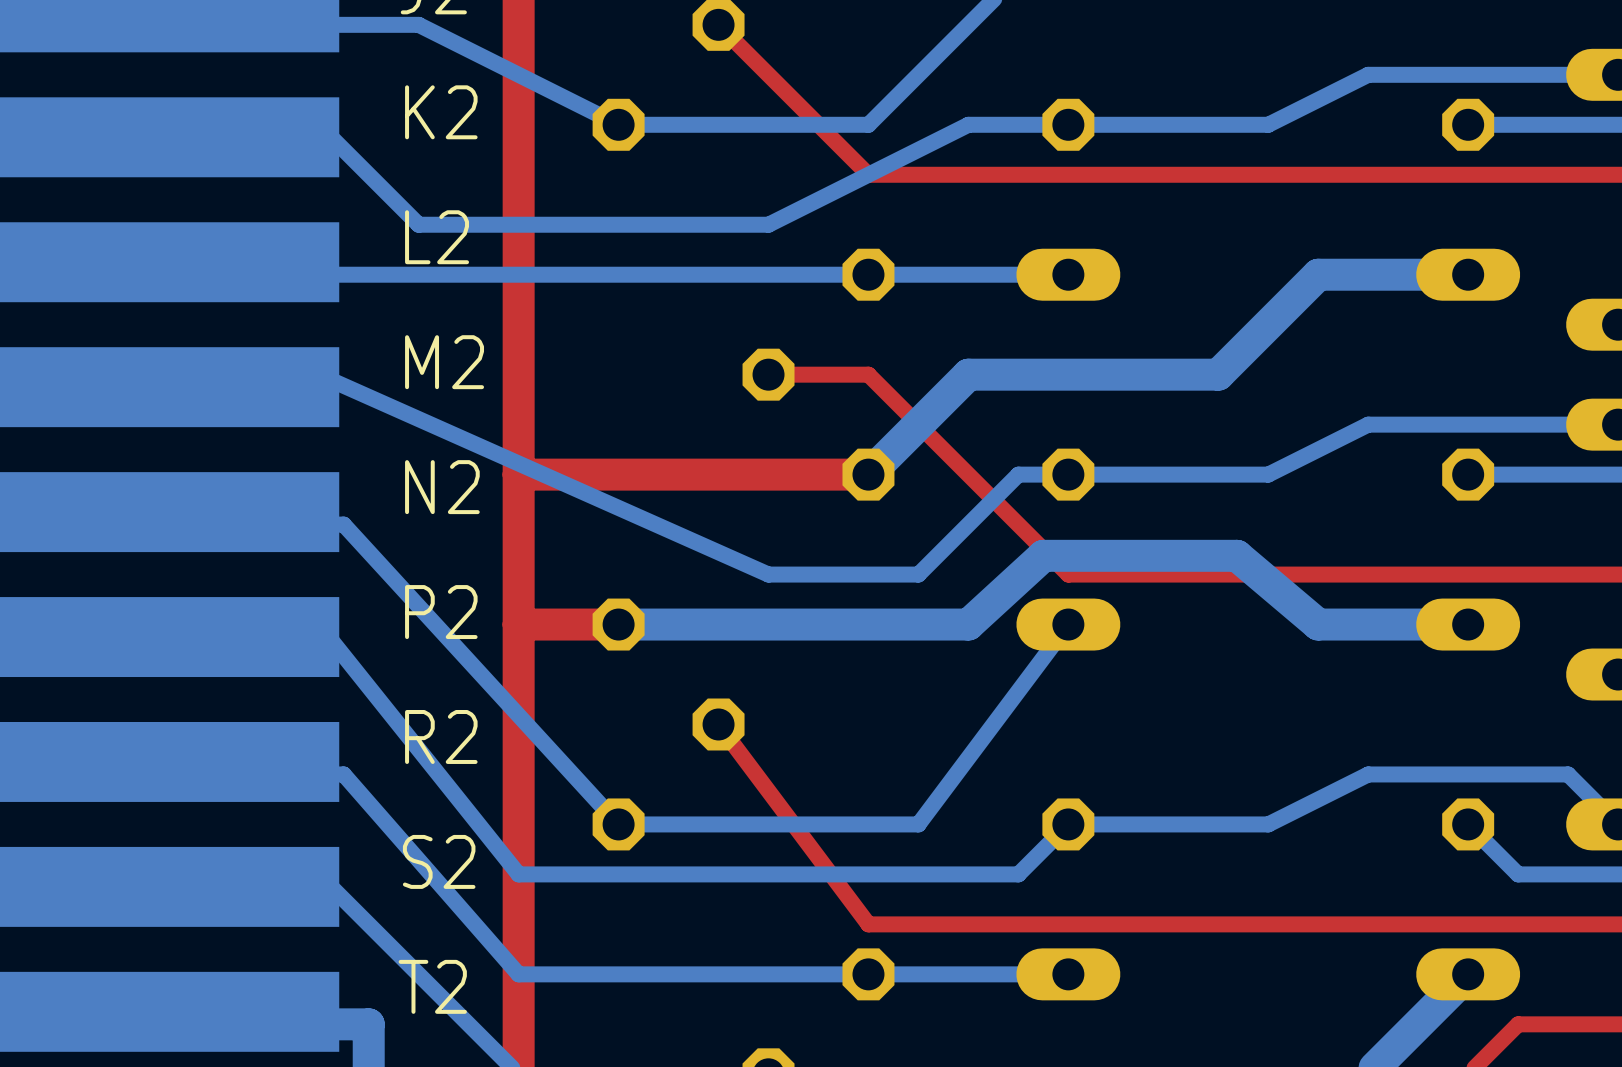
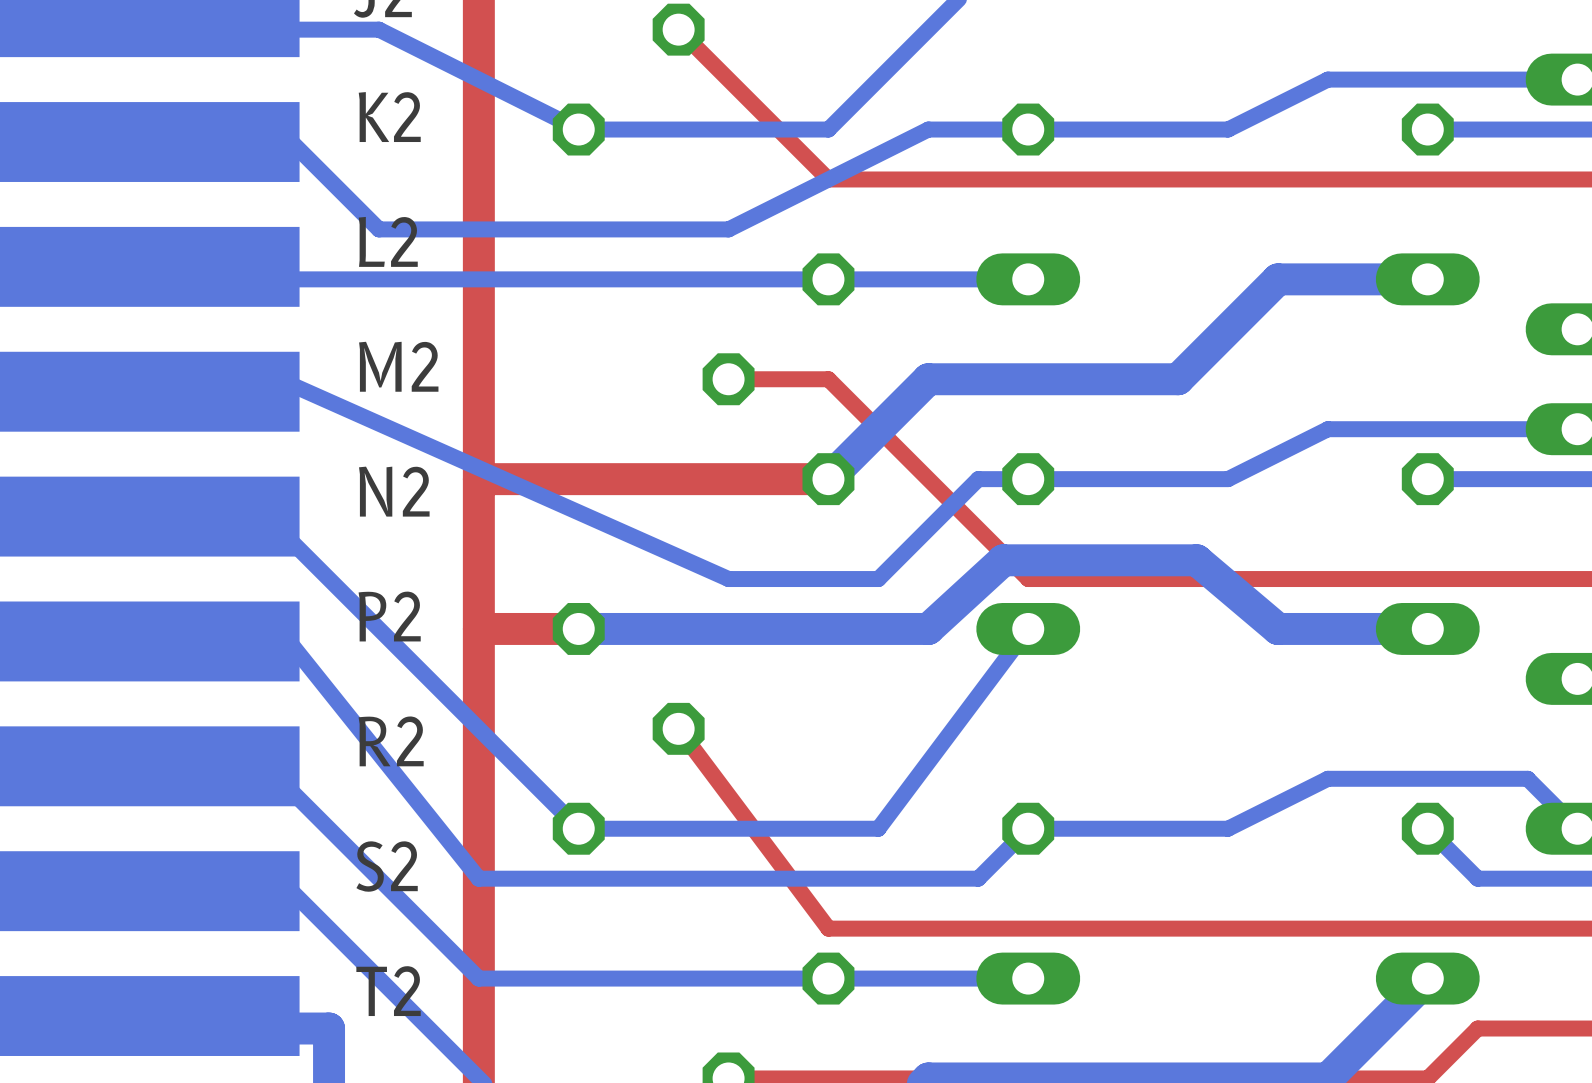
bottom track: (318, 524) (343, 524) (618, 824) -> (279, 529) (578, 828)
bottom track: (318, 774) (343, 774) (518, 974) -> (279, 778) (478, 978)

